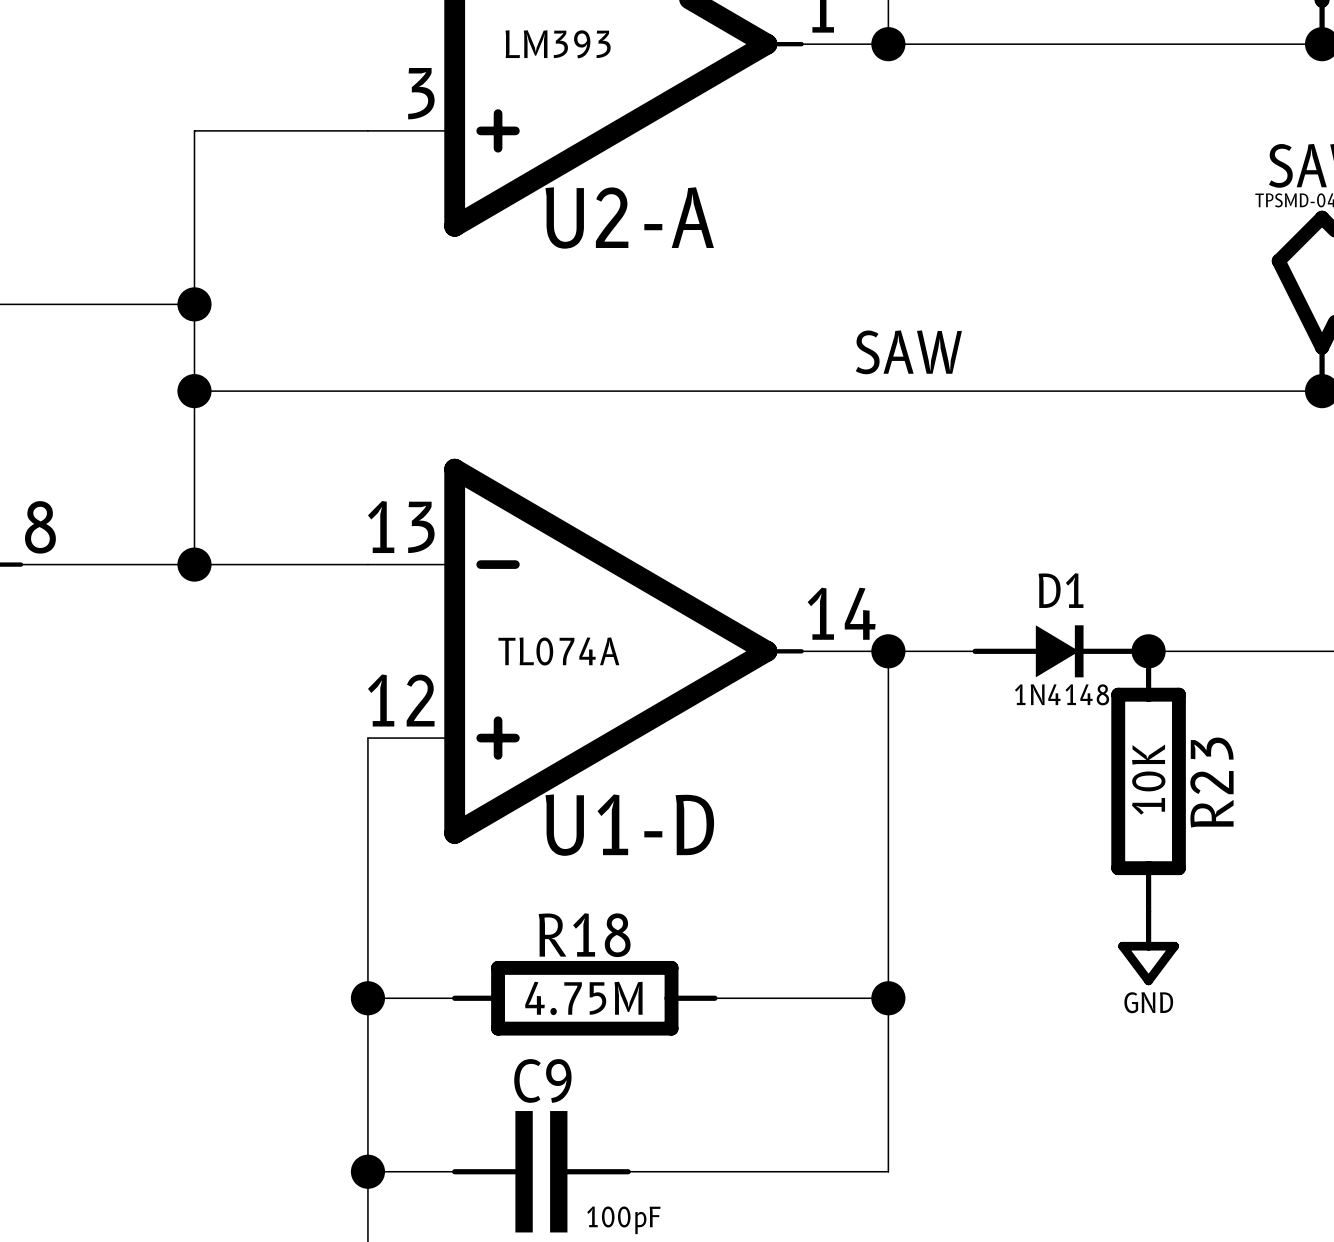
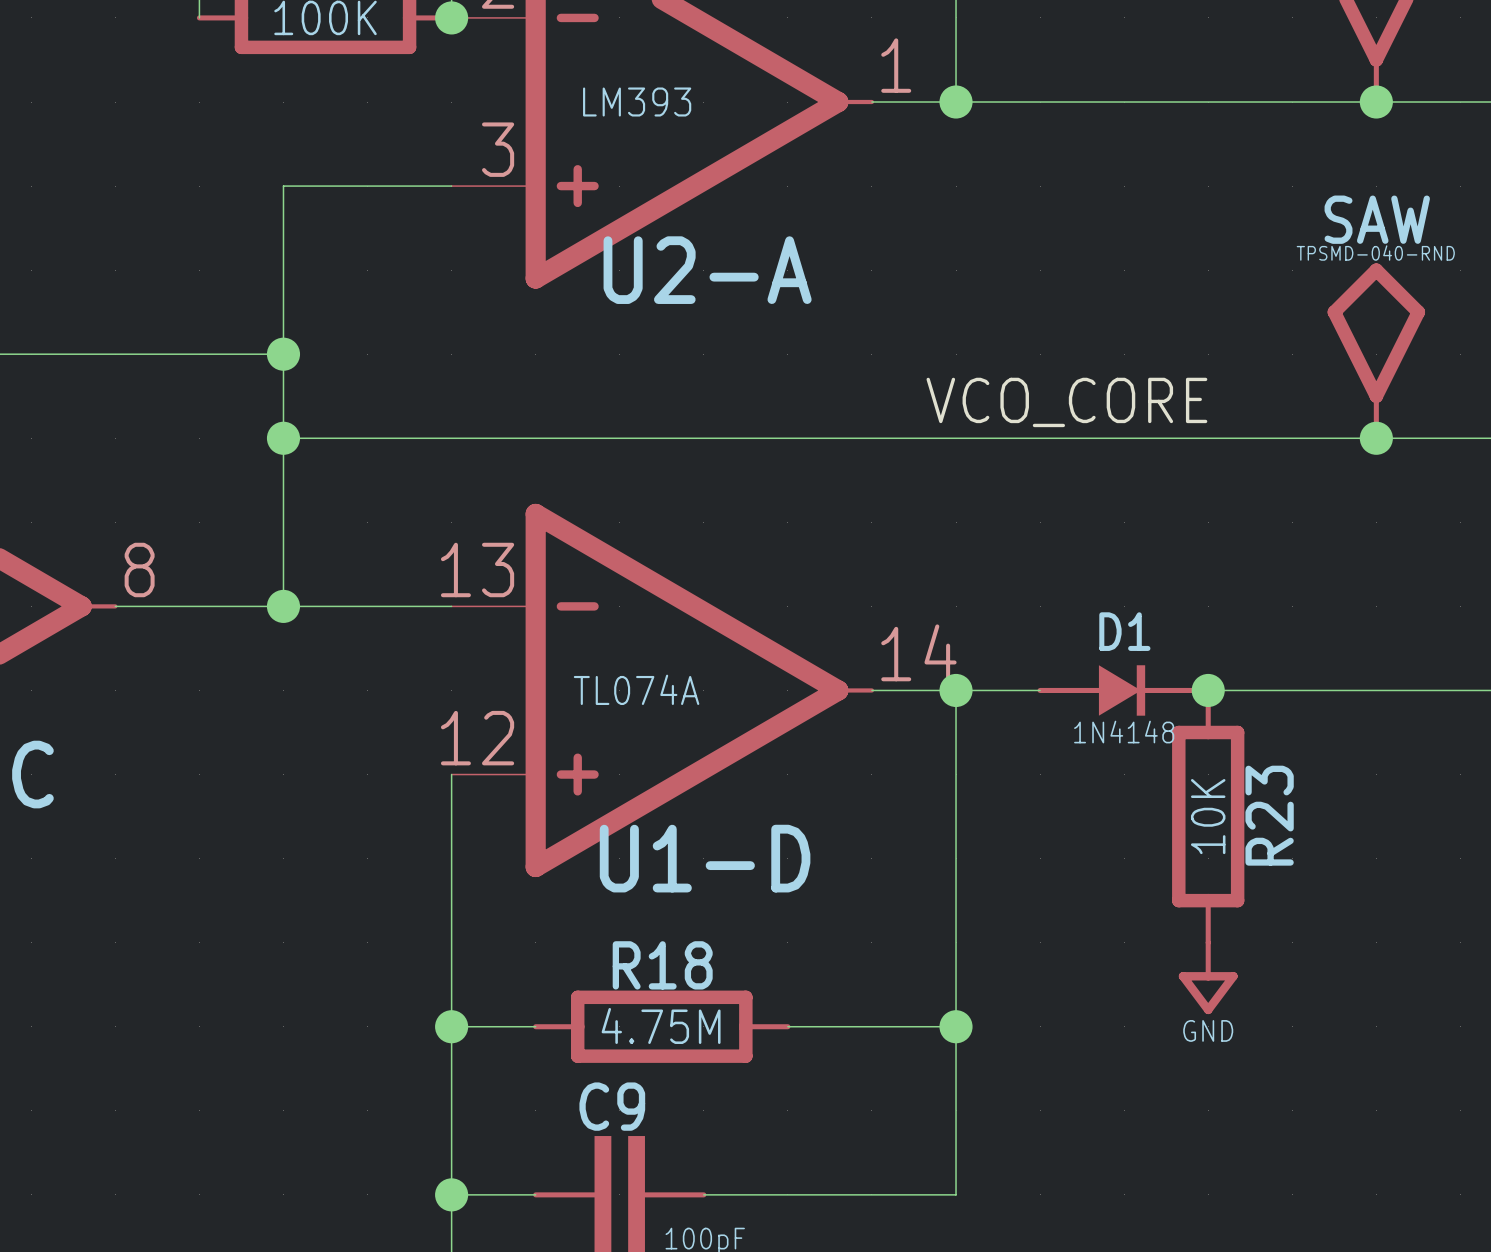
label: SAW (908, 352) -> VCO_CORE (1066, 402)

